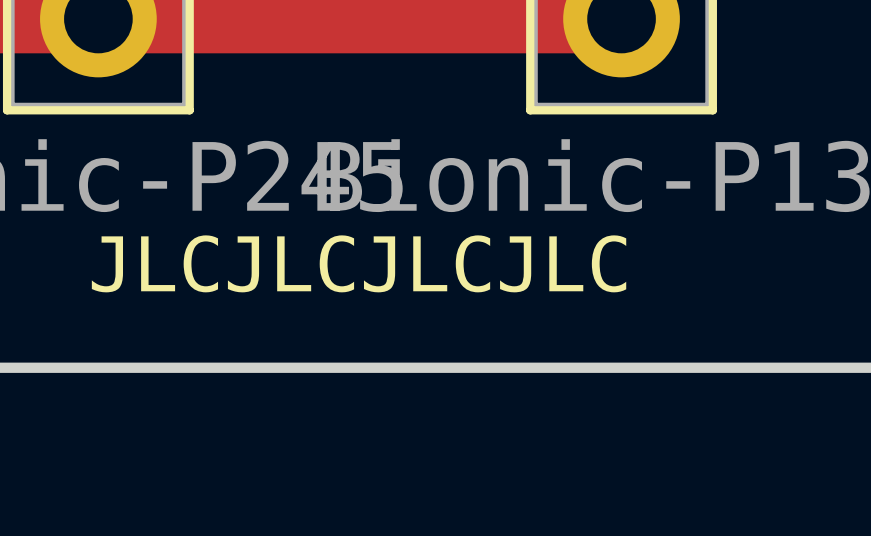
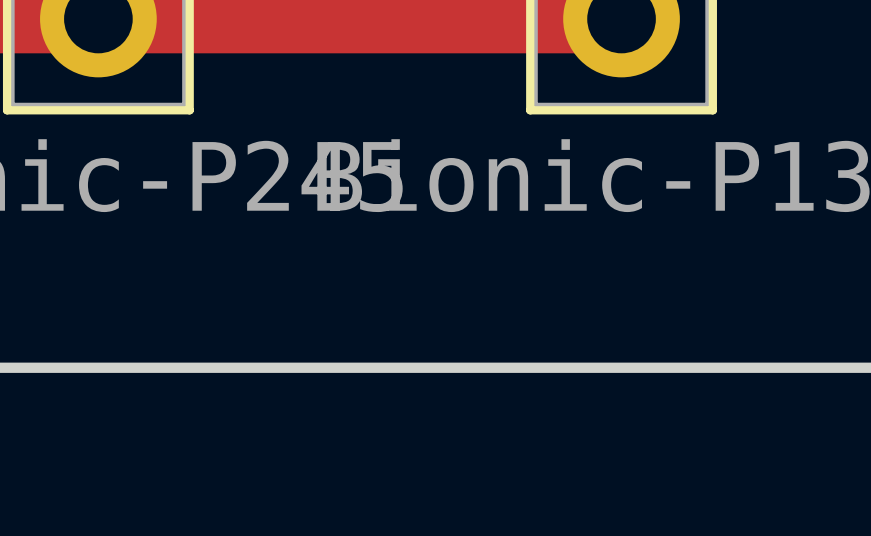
text: JLCJLCJLCJLC (359, 263) -> none

